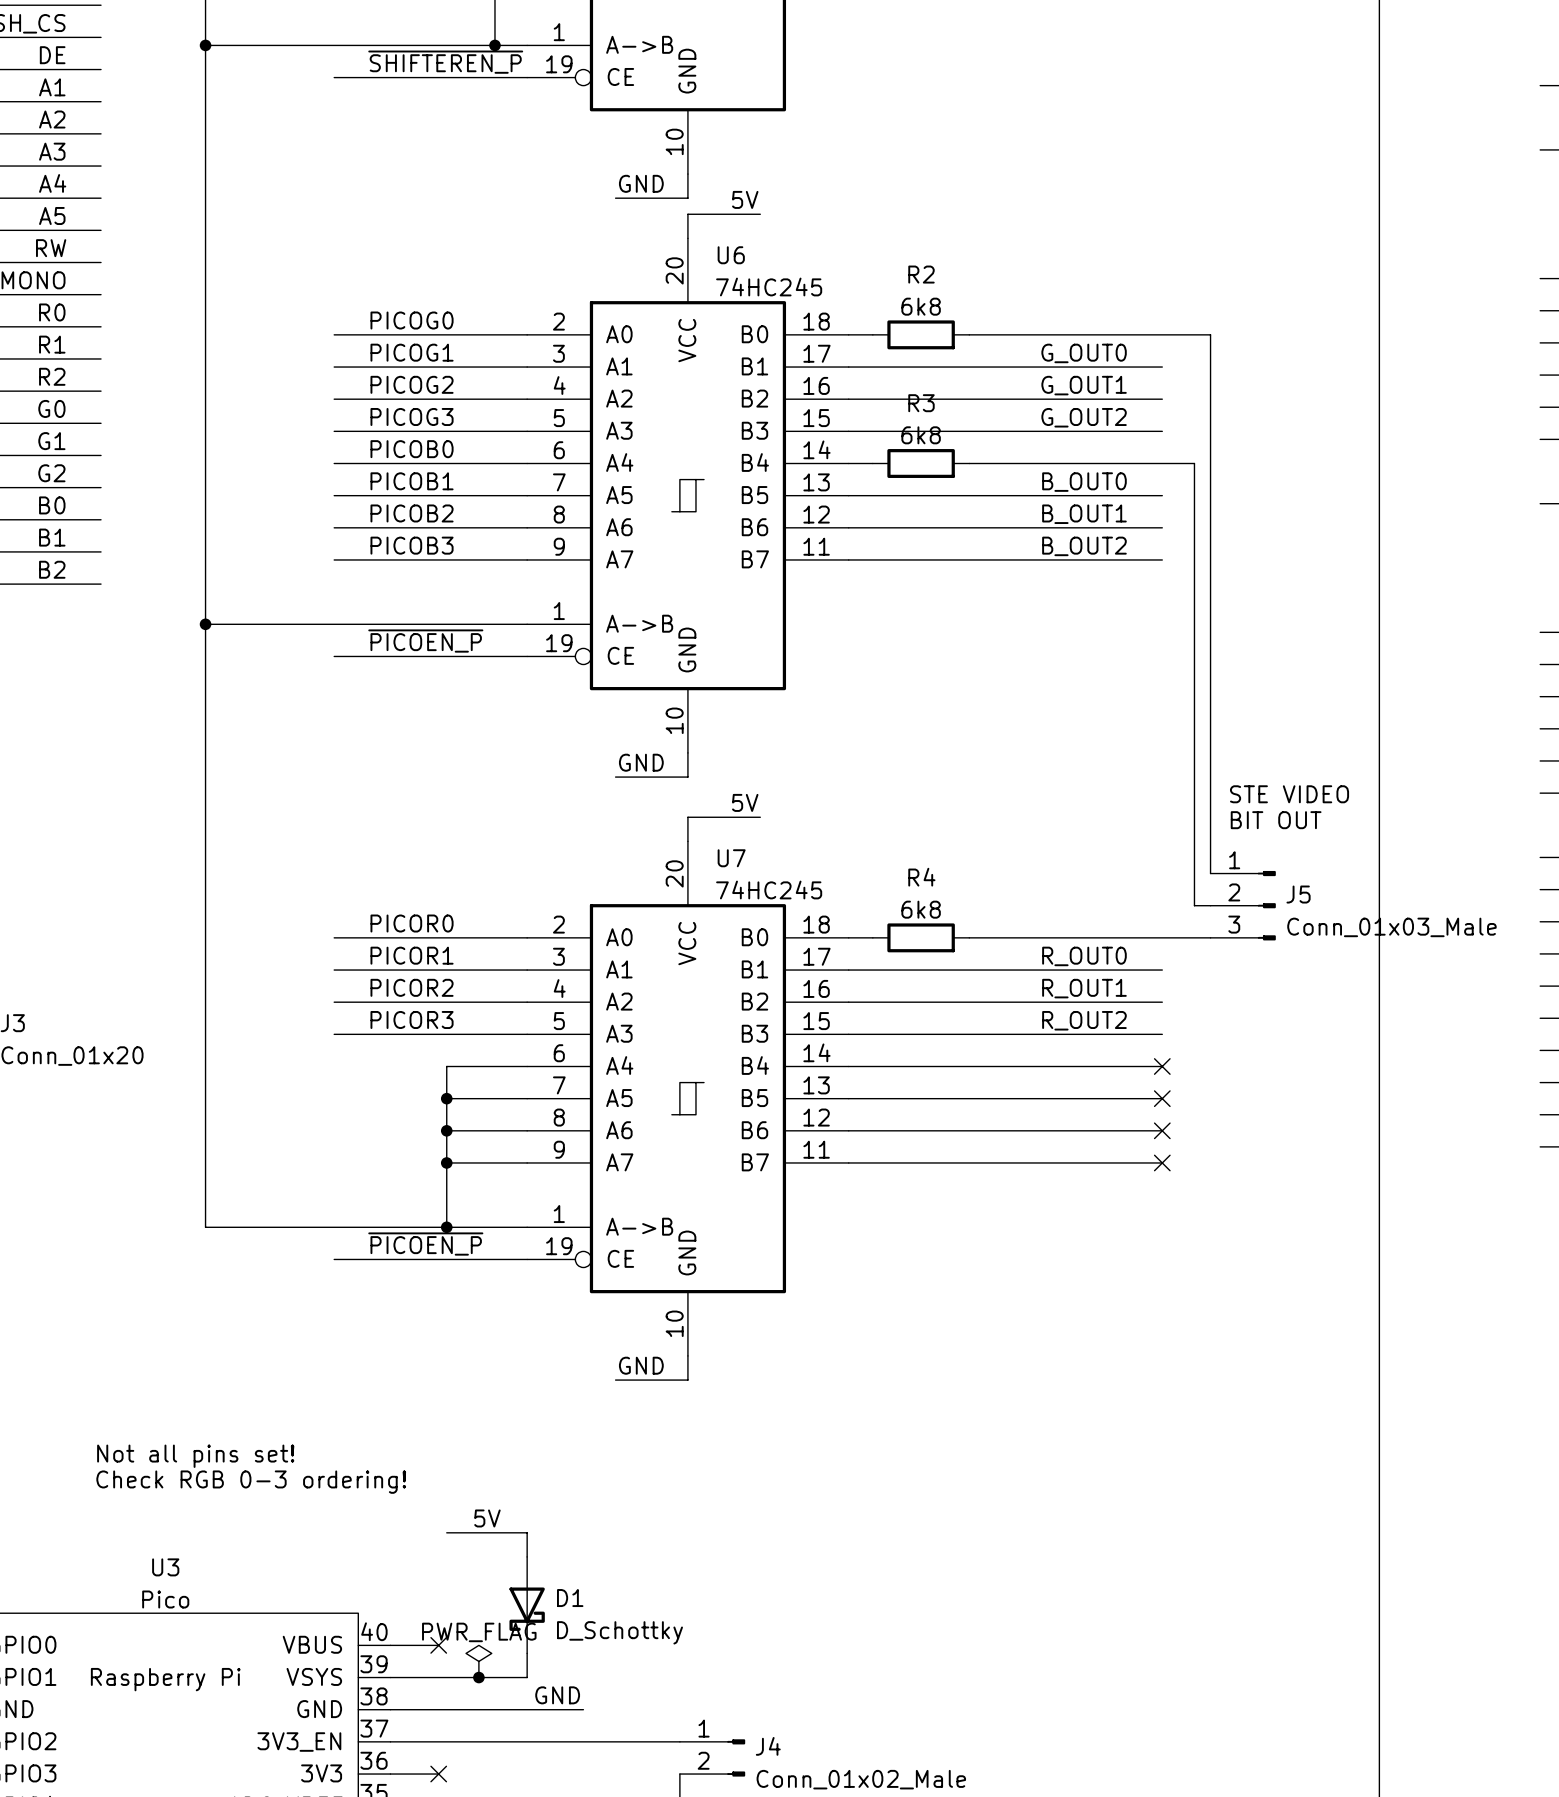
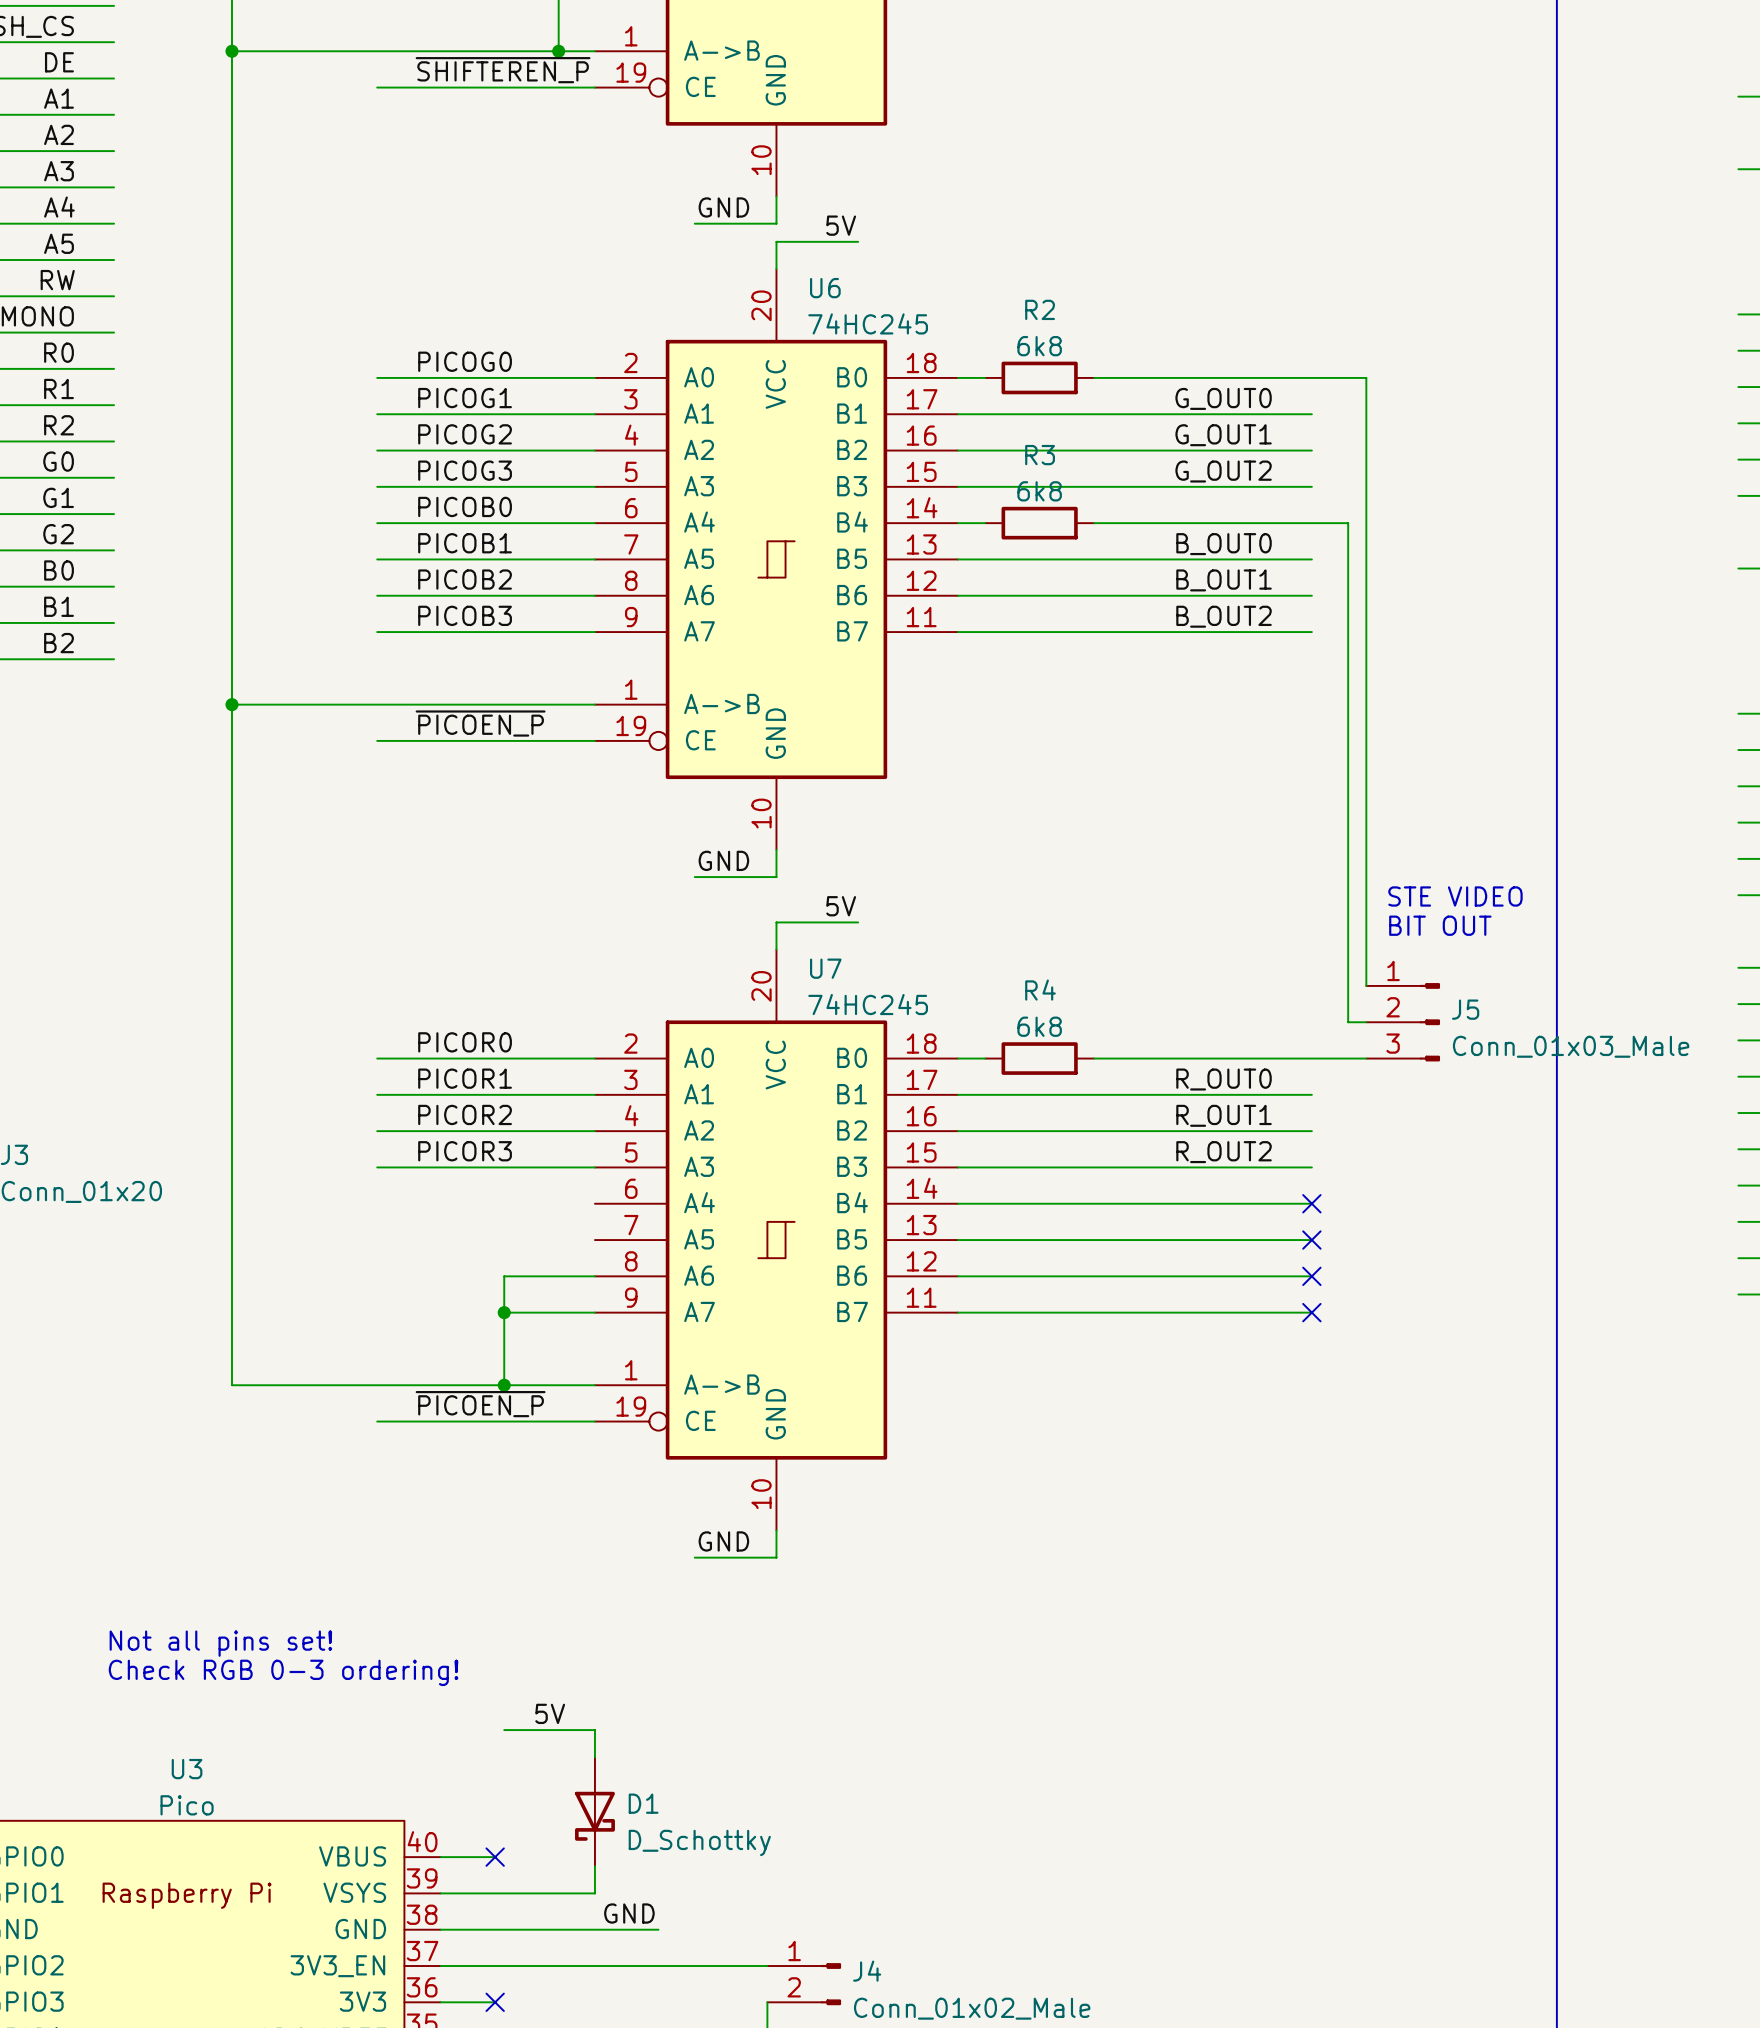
wire: (527, 1066) (446, 1066) (446, 1130) -> none
wire: (446, 1098) (527, 1098) -> none
junction: (446, 1098) -> none
junction: (446, 1130) -> none
power symbol: PWR_FLAG (478, 1661) -> none
junction: (478, 1677) -> none

